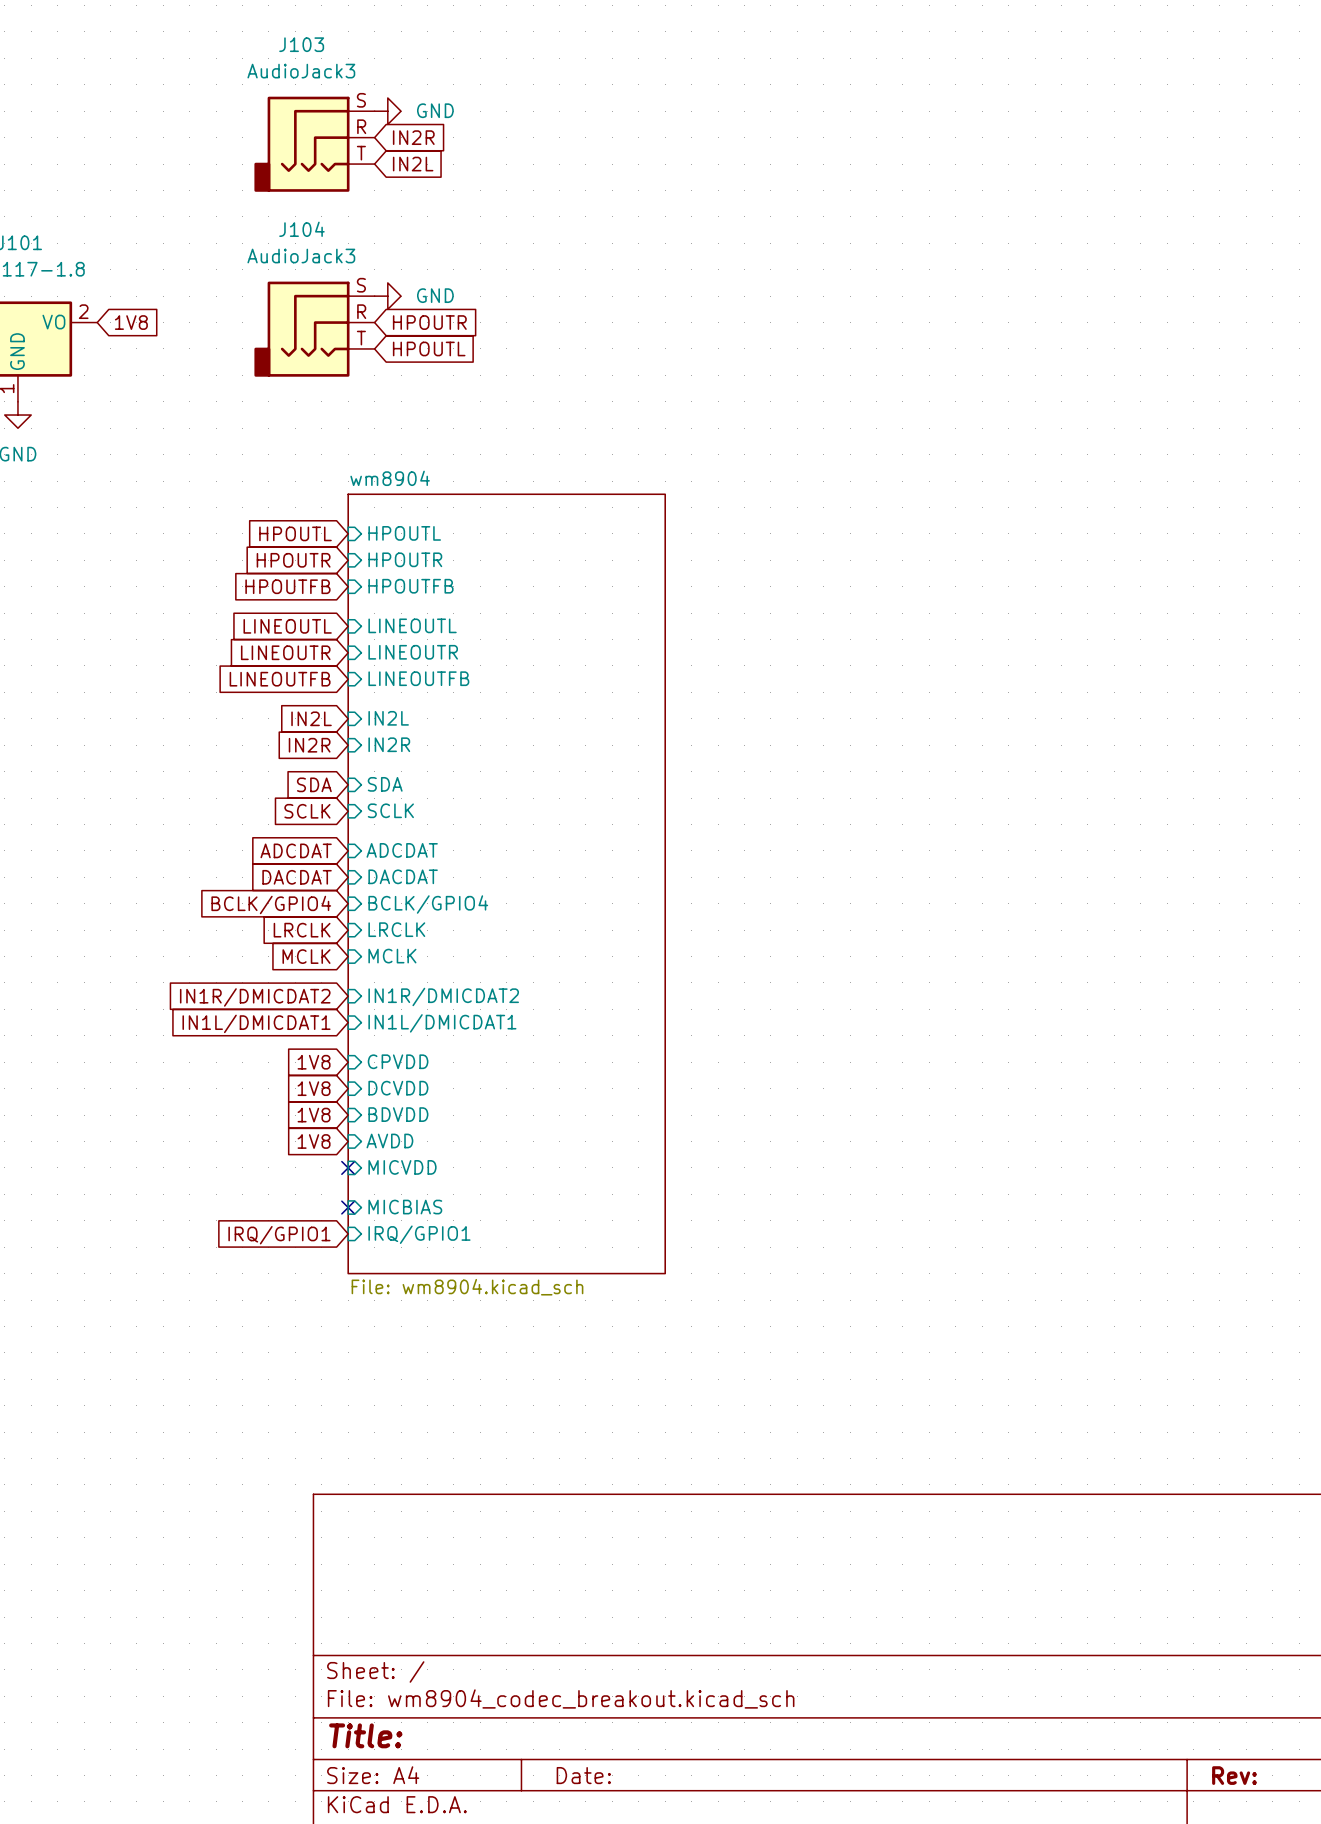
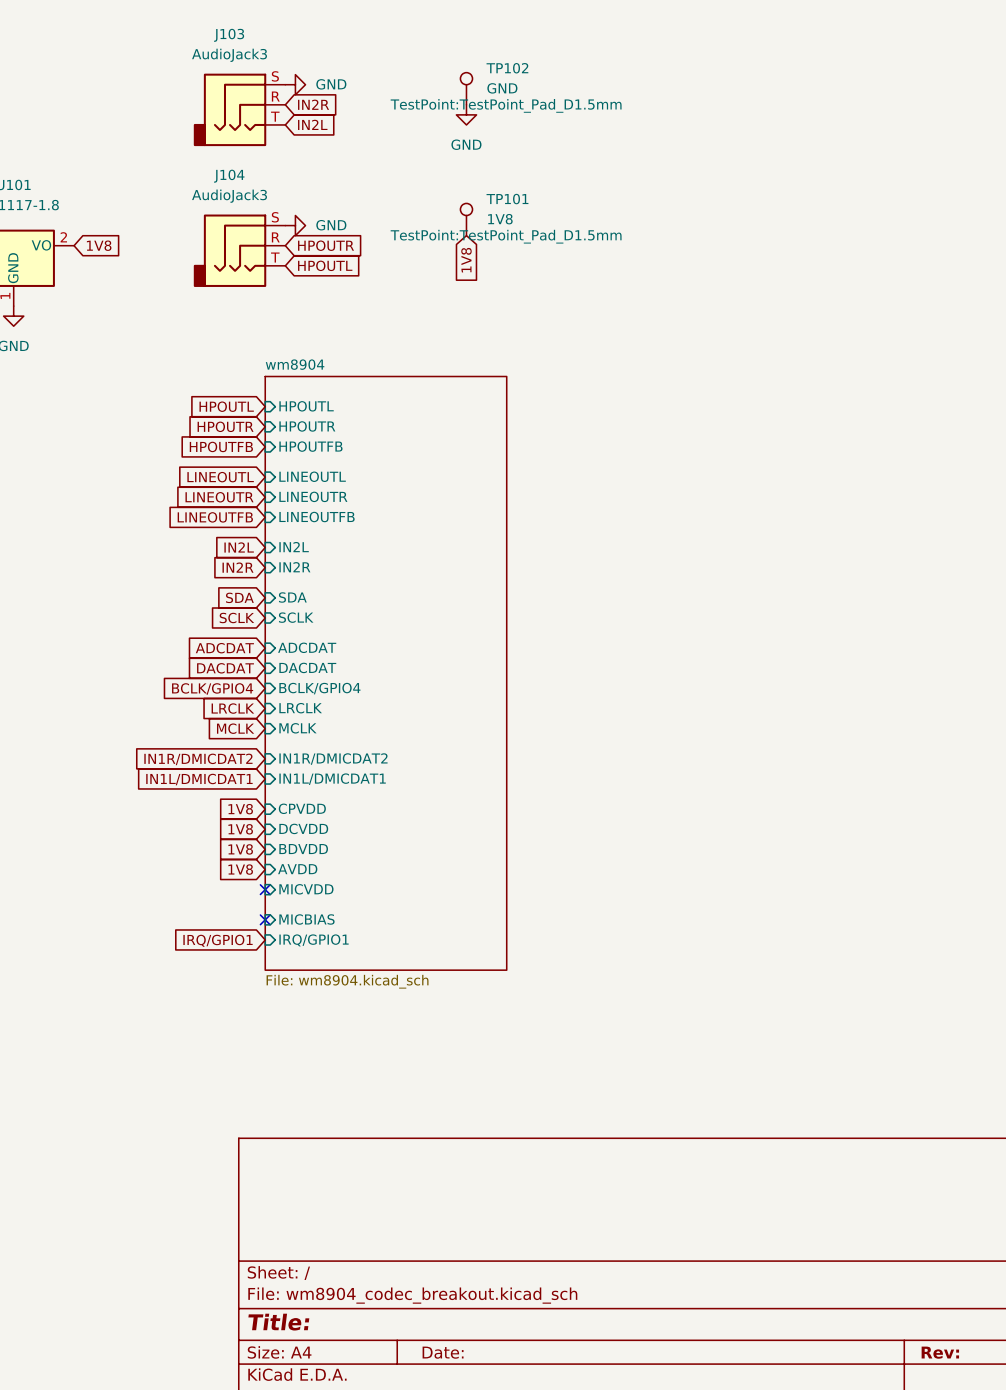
TP102: none -> GND (466, 88)
power symbol: none -> GND (466, 114)
TP101: none -> 1V8 (466, 219)
global label: none -> 1V8 (466, 260)

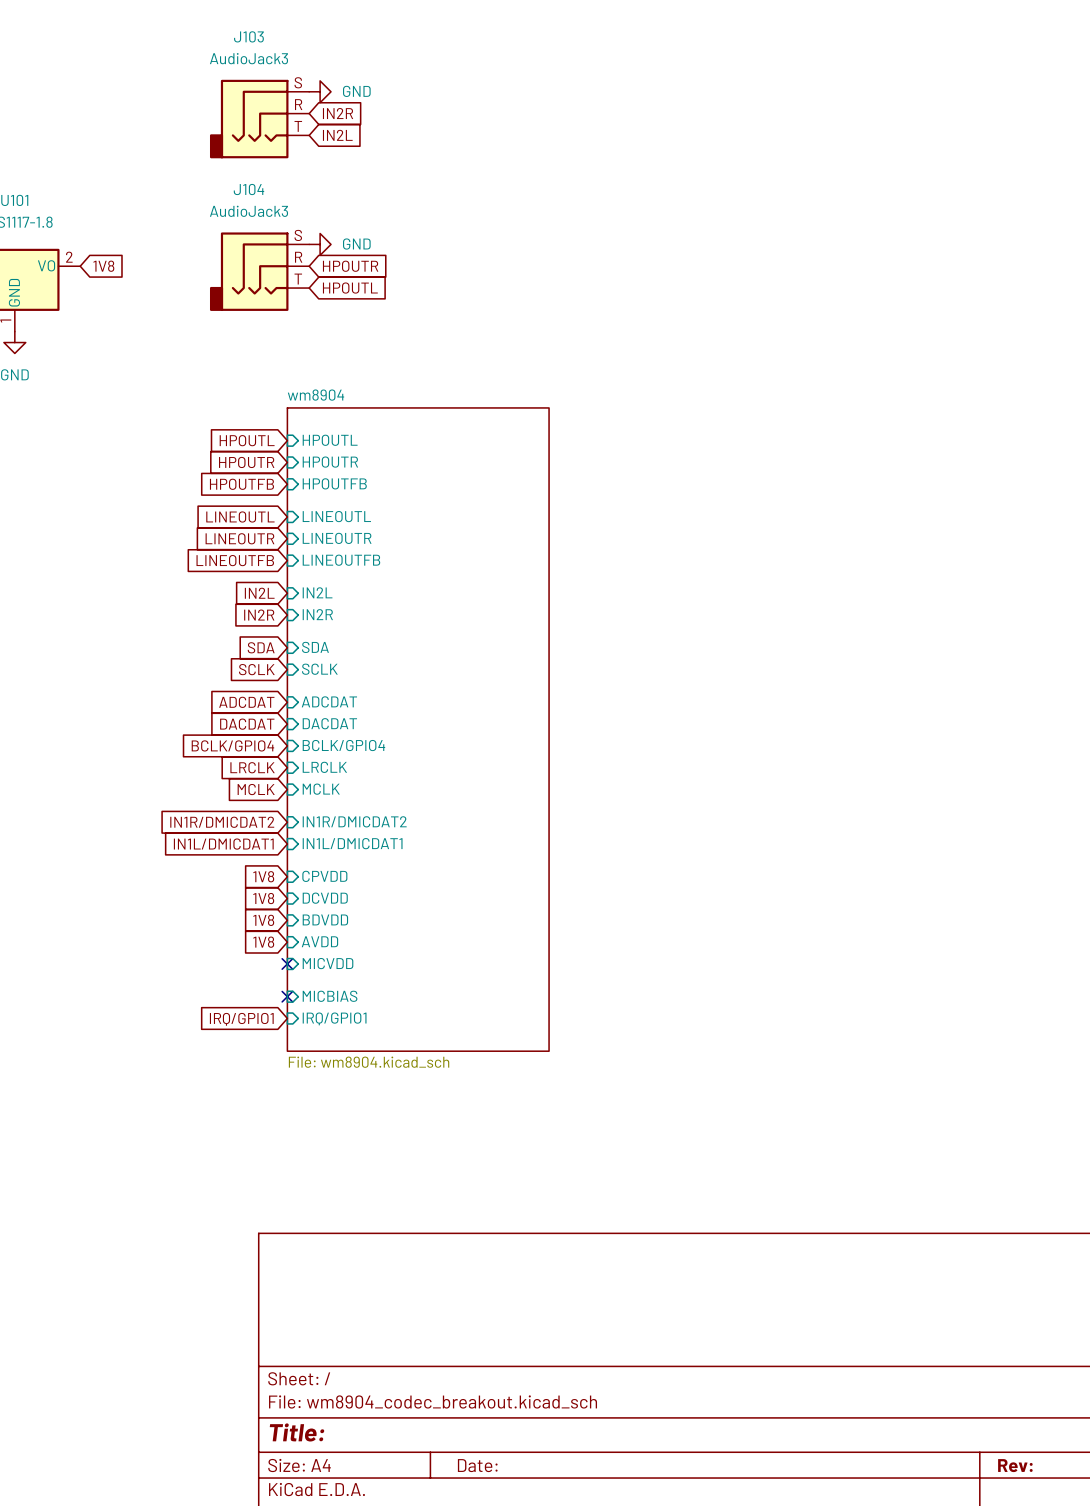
TP102: GND (466, 88) -> none
power symbol: GND (466, 114) -> none
TP101: 1V8 (466, 219) -> none
global label: 1V8 (466, 260) -> none

